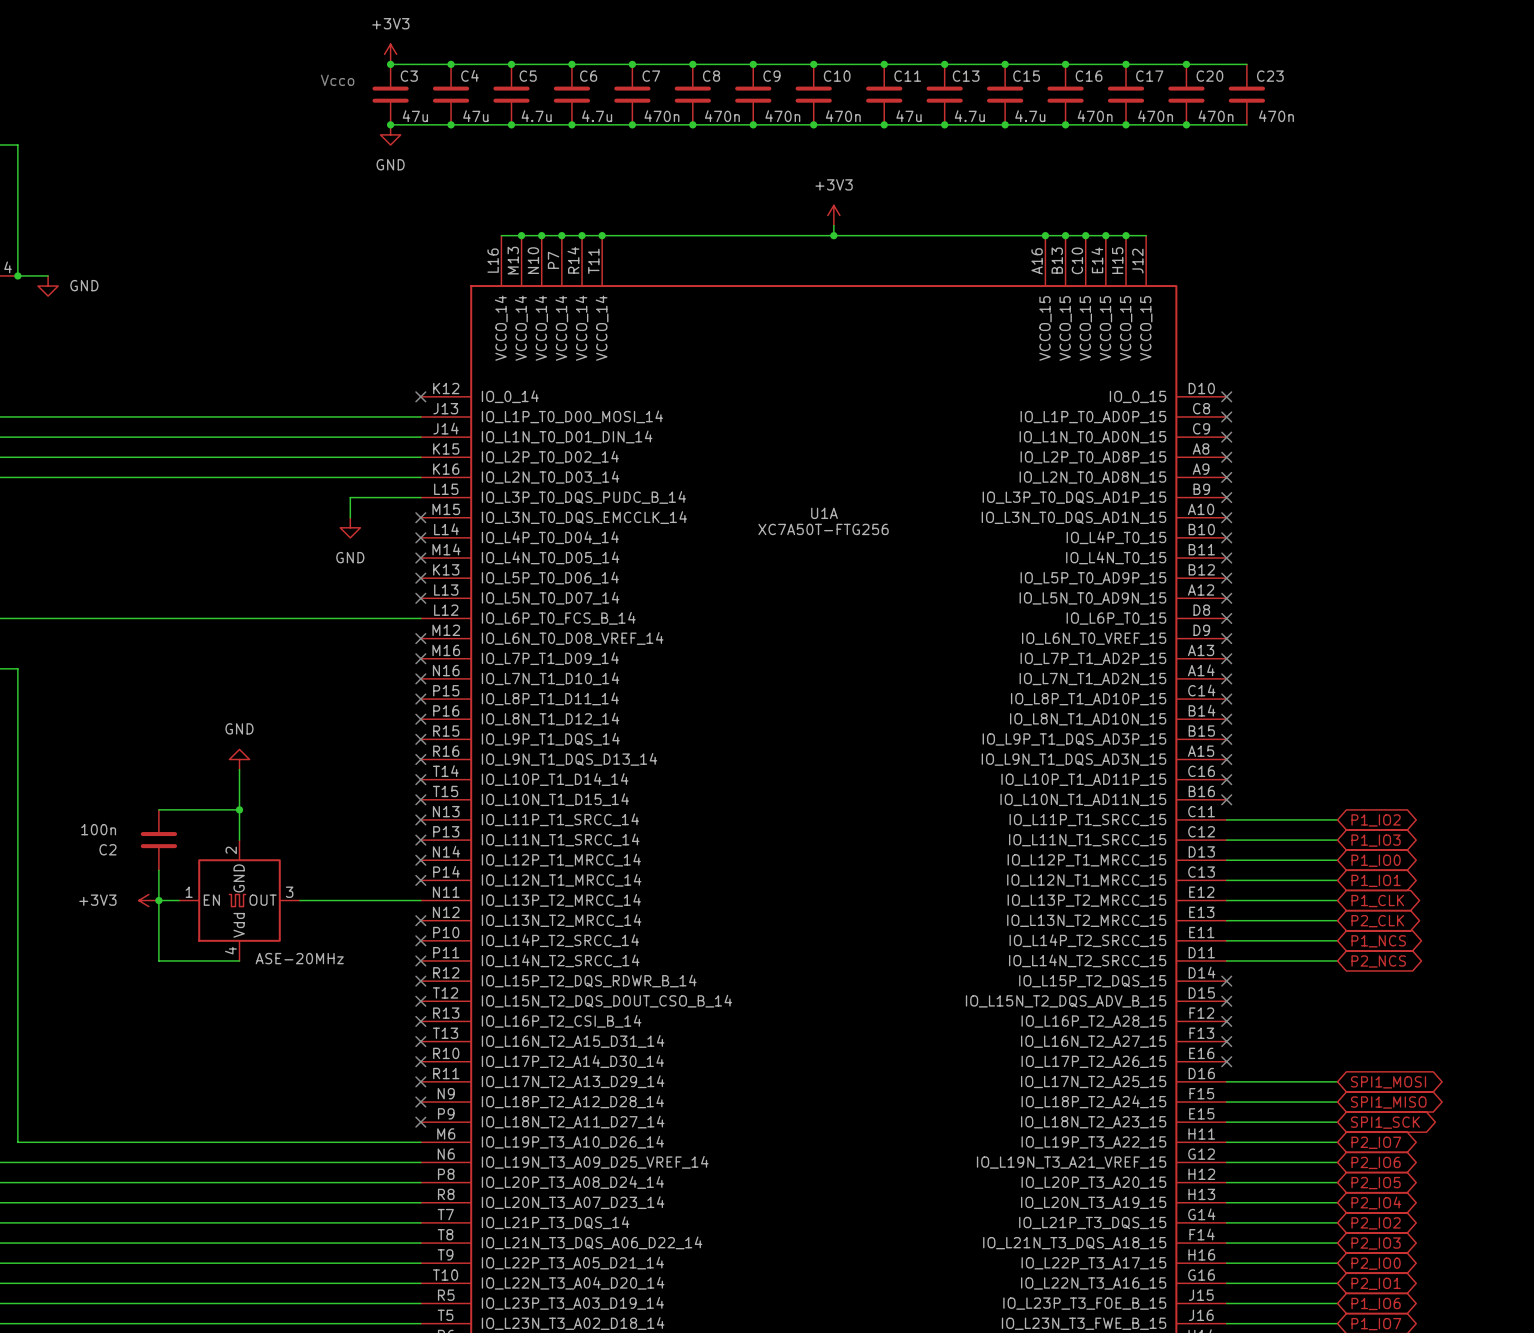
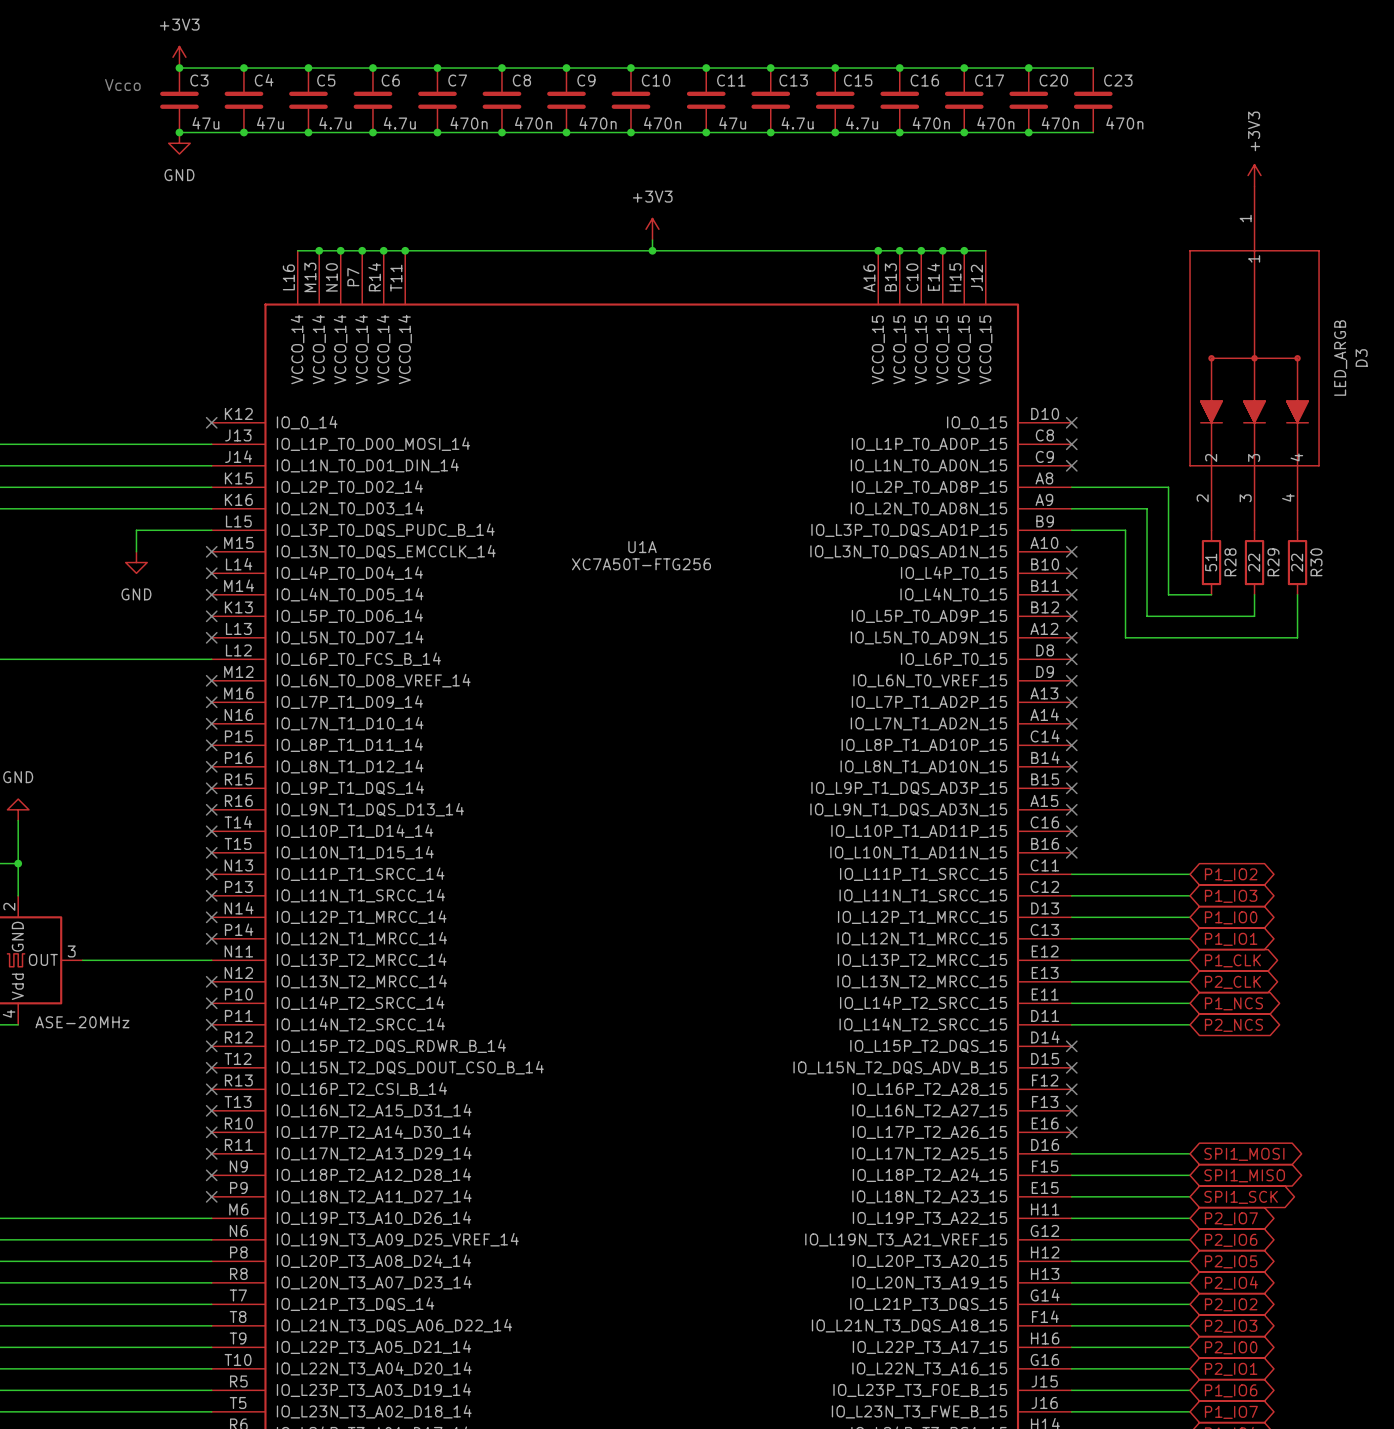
power symbol: none -> +3V3 (1254, 175)
D3: none -> LED_ARGB (1254, 358)
wire: none -> (1071, 487) (1168, 487) (1168, 594) (1211, 594)
no-connect mark: (1226, 457) -> none
wire: none -> (1071, 508) (1147, 508) (1147, 616) (1254, 616) (1254, 594)
no-connect mark: (1226, 477) -> none
wire: none -> (1071, 530) (1125, 530) (1125, 637) (1297, 637) (1297, 594)
no-connect mark: (1226, 497) -> none
R28: none -> 51 (1211, 562)
R29: none -> 22 (1254, 562)
R30: none -> 22 (1297, 562)

